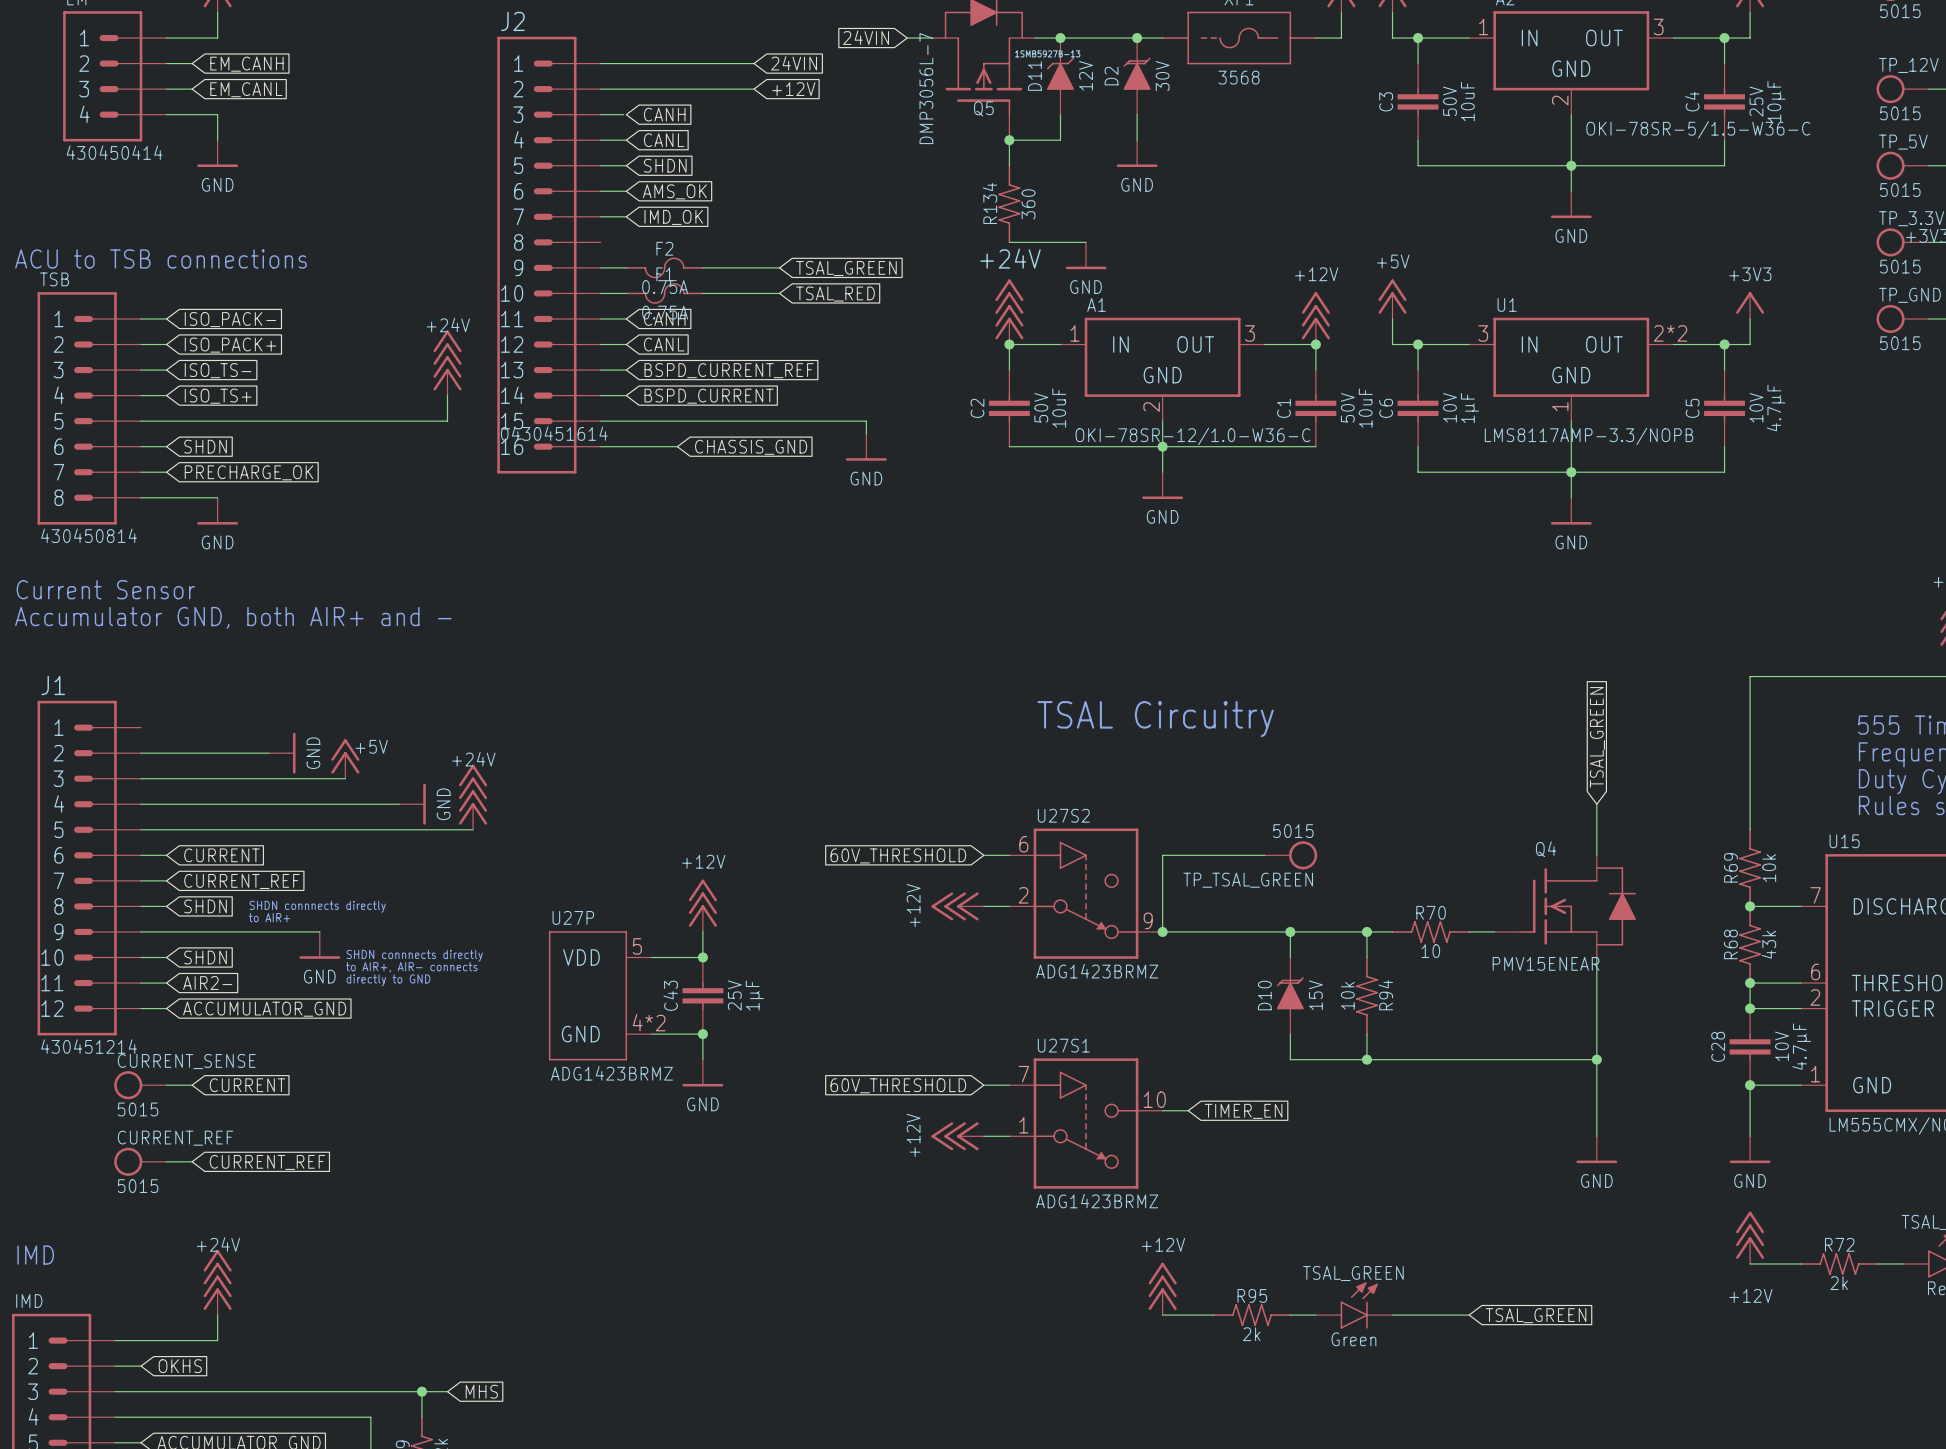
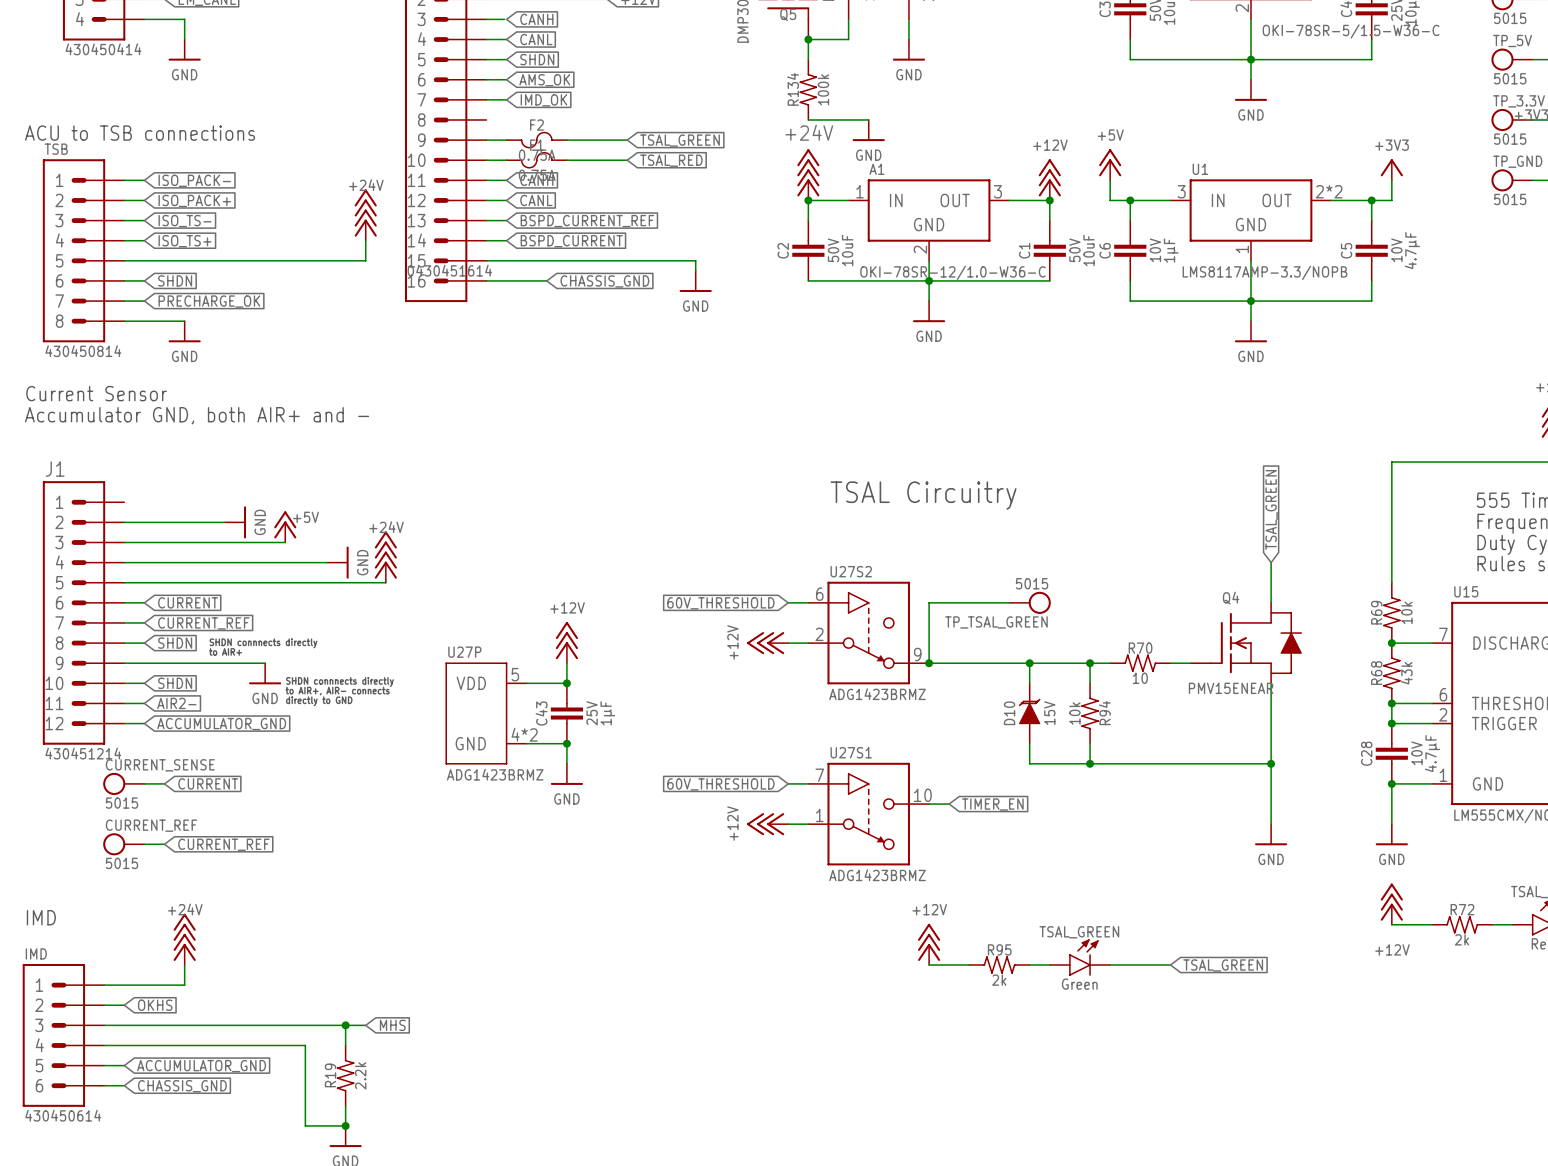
R134 text: 360 (1028, 204) -> 100k (823, 89)

